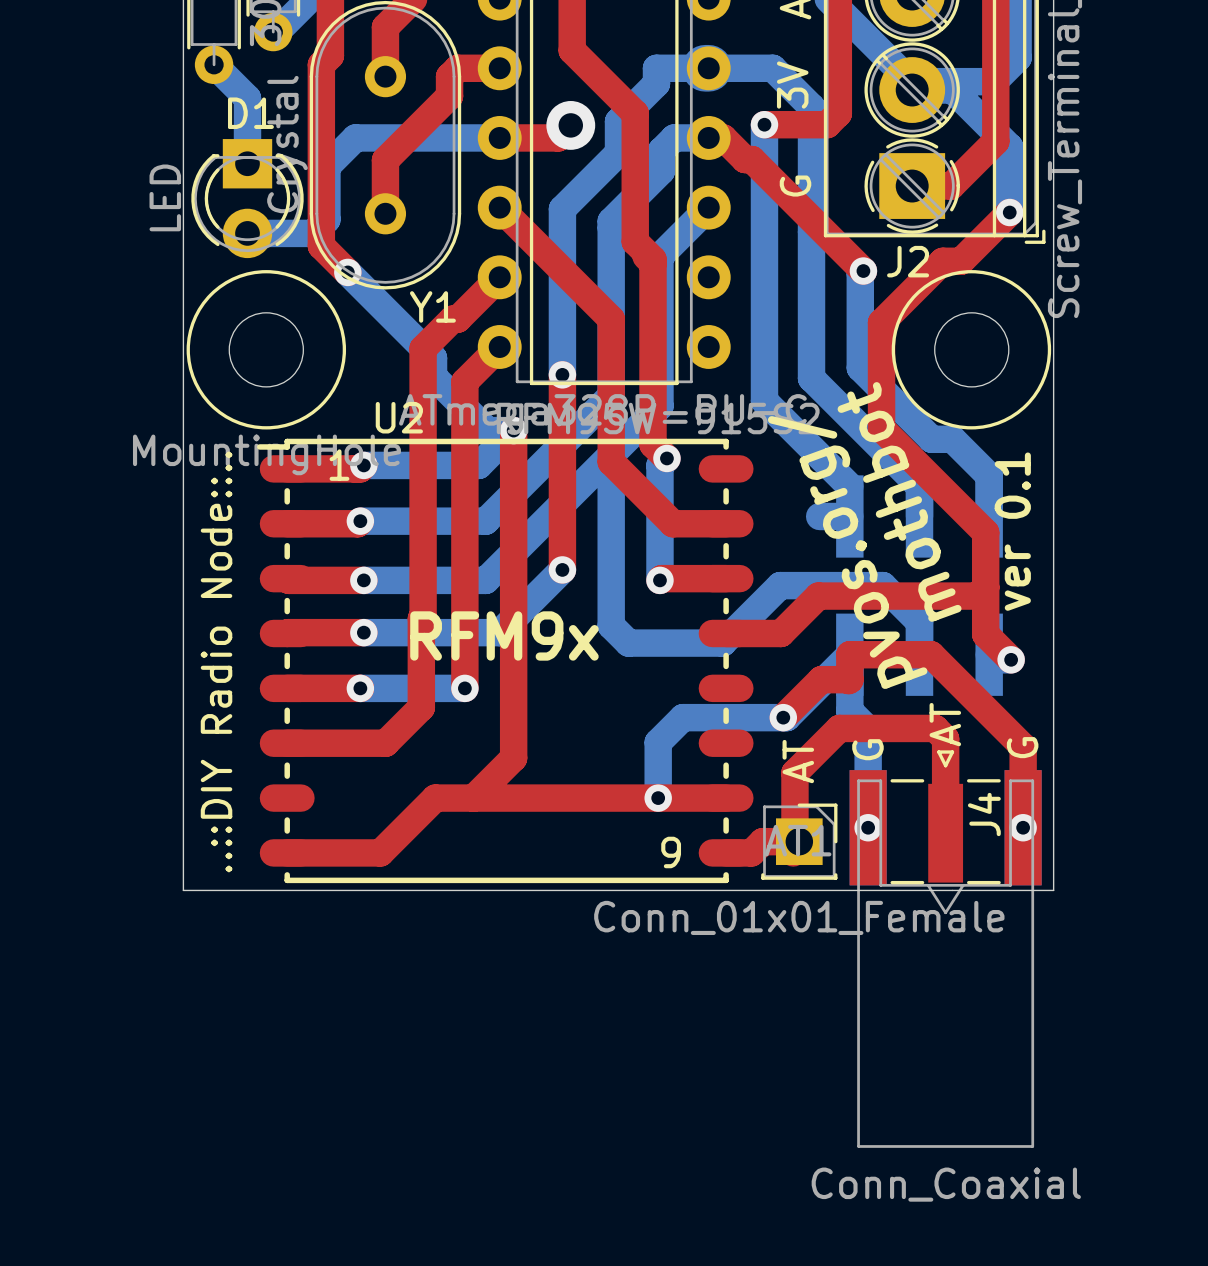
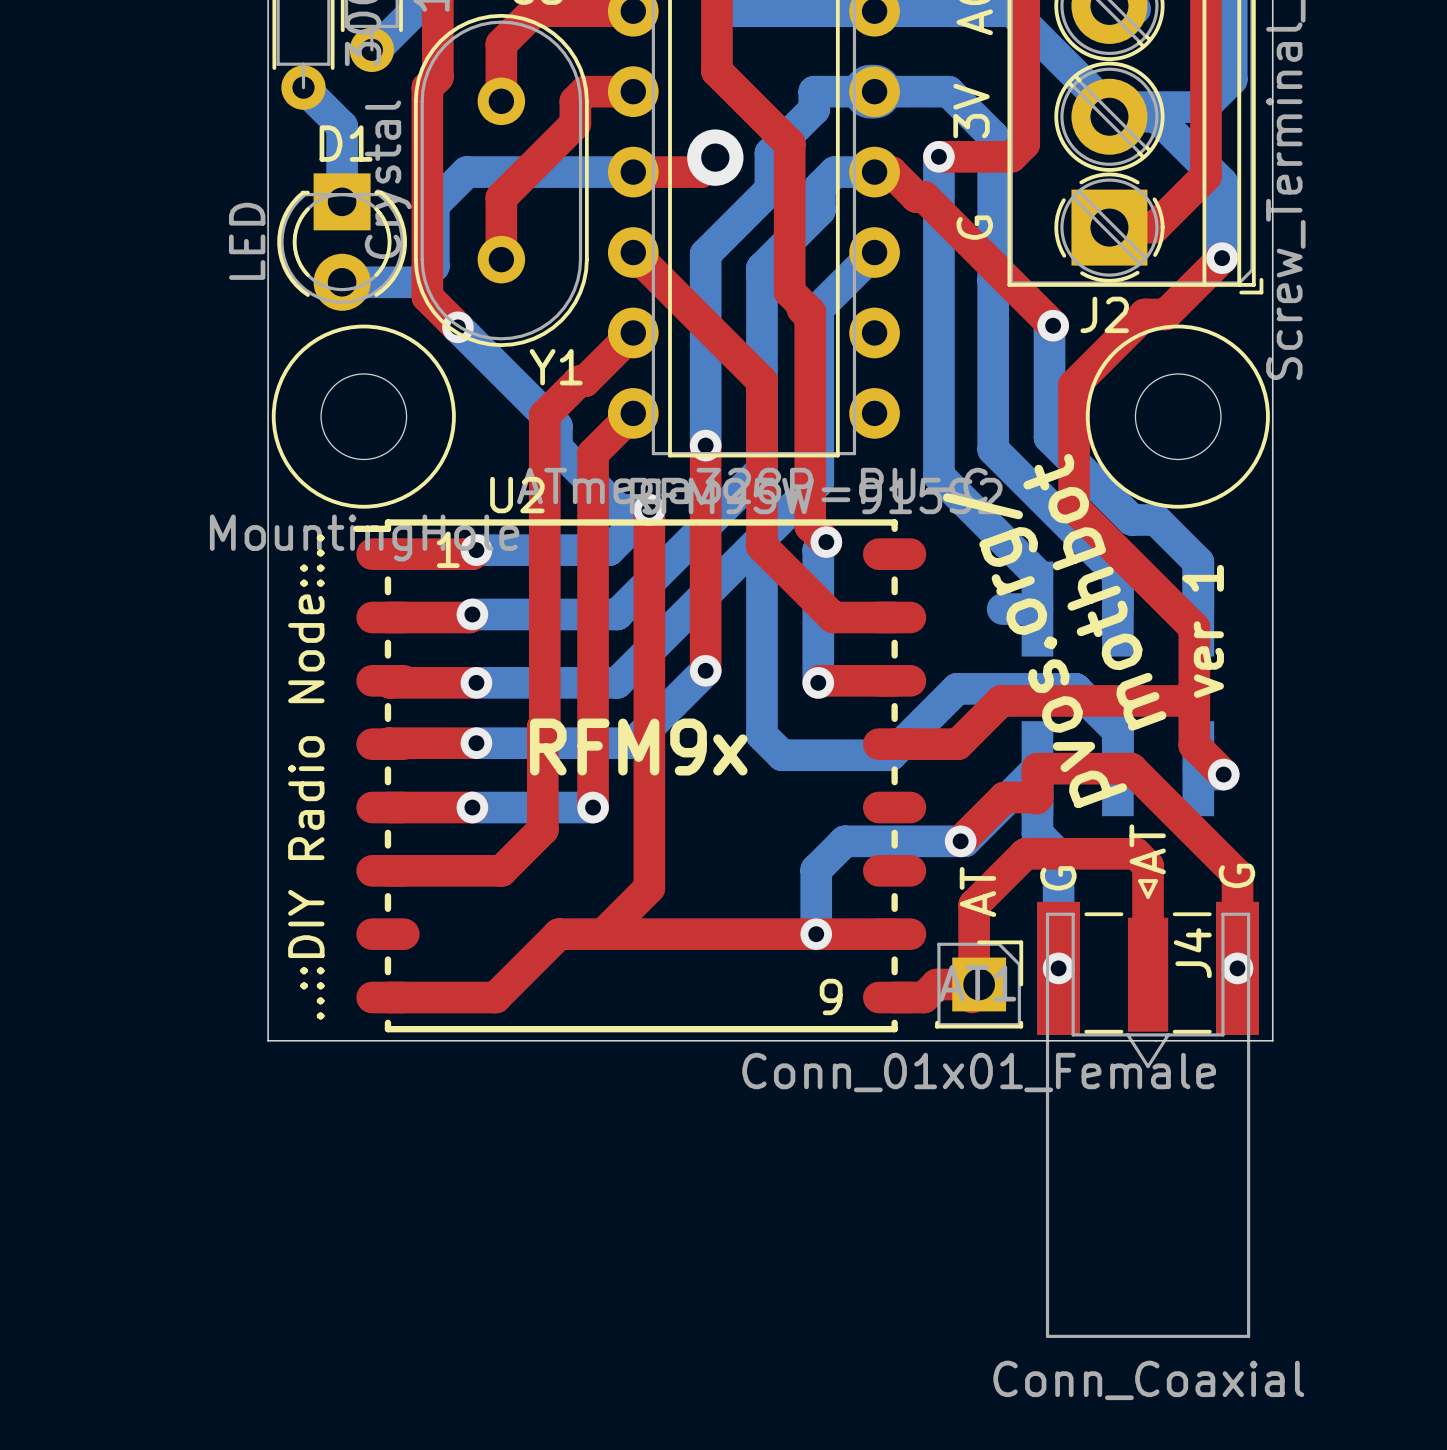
text: ver 0.1 (1012, 531) -> ver 1 (1203, 631)

